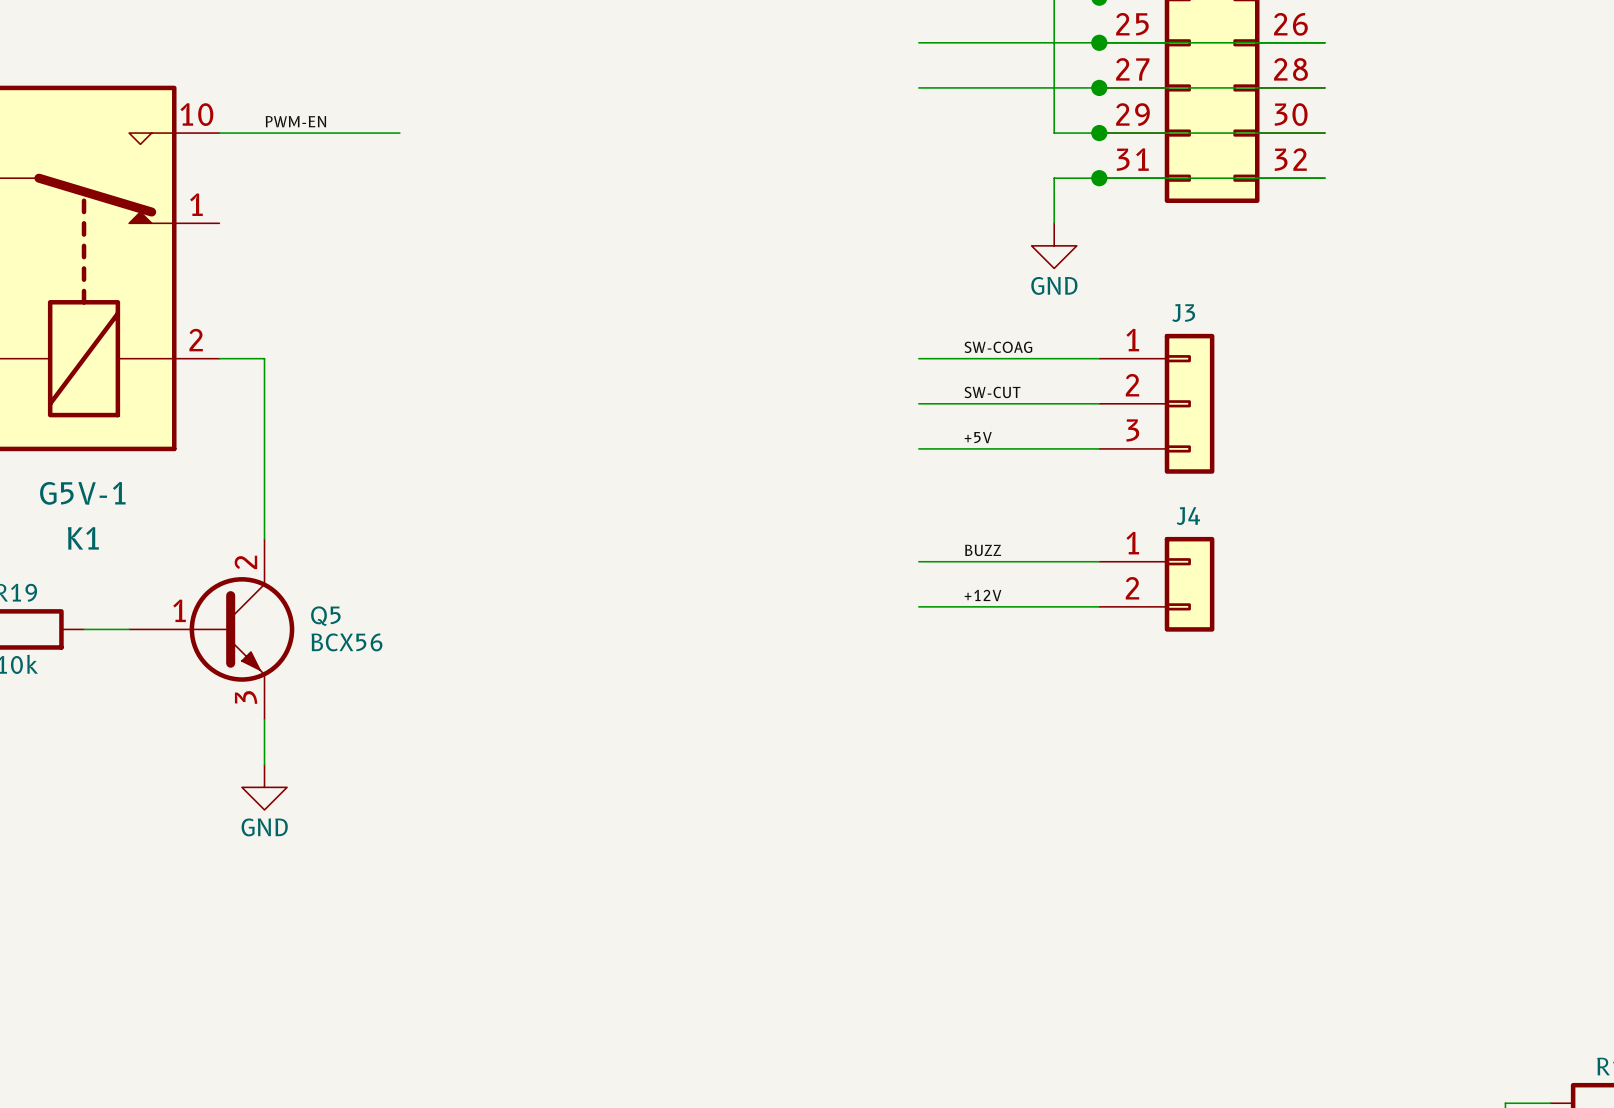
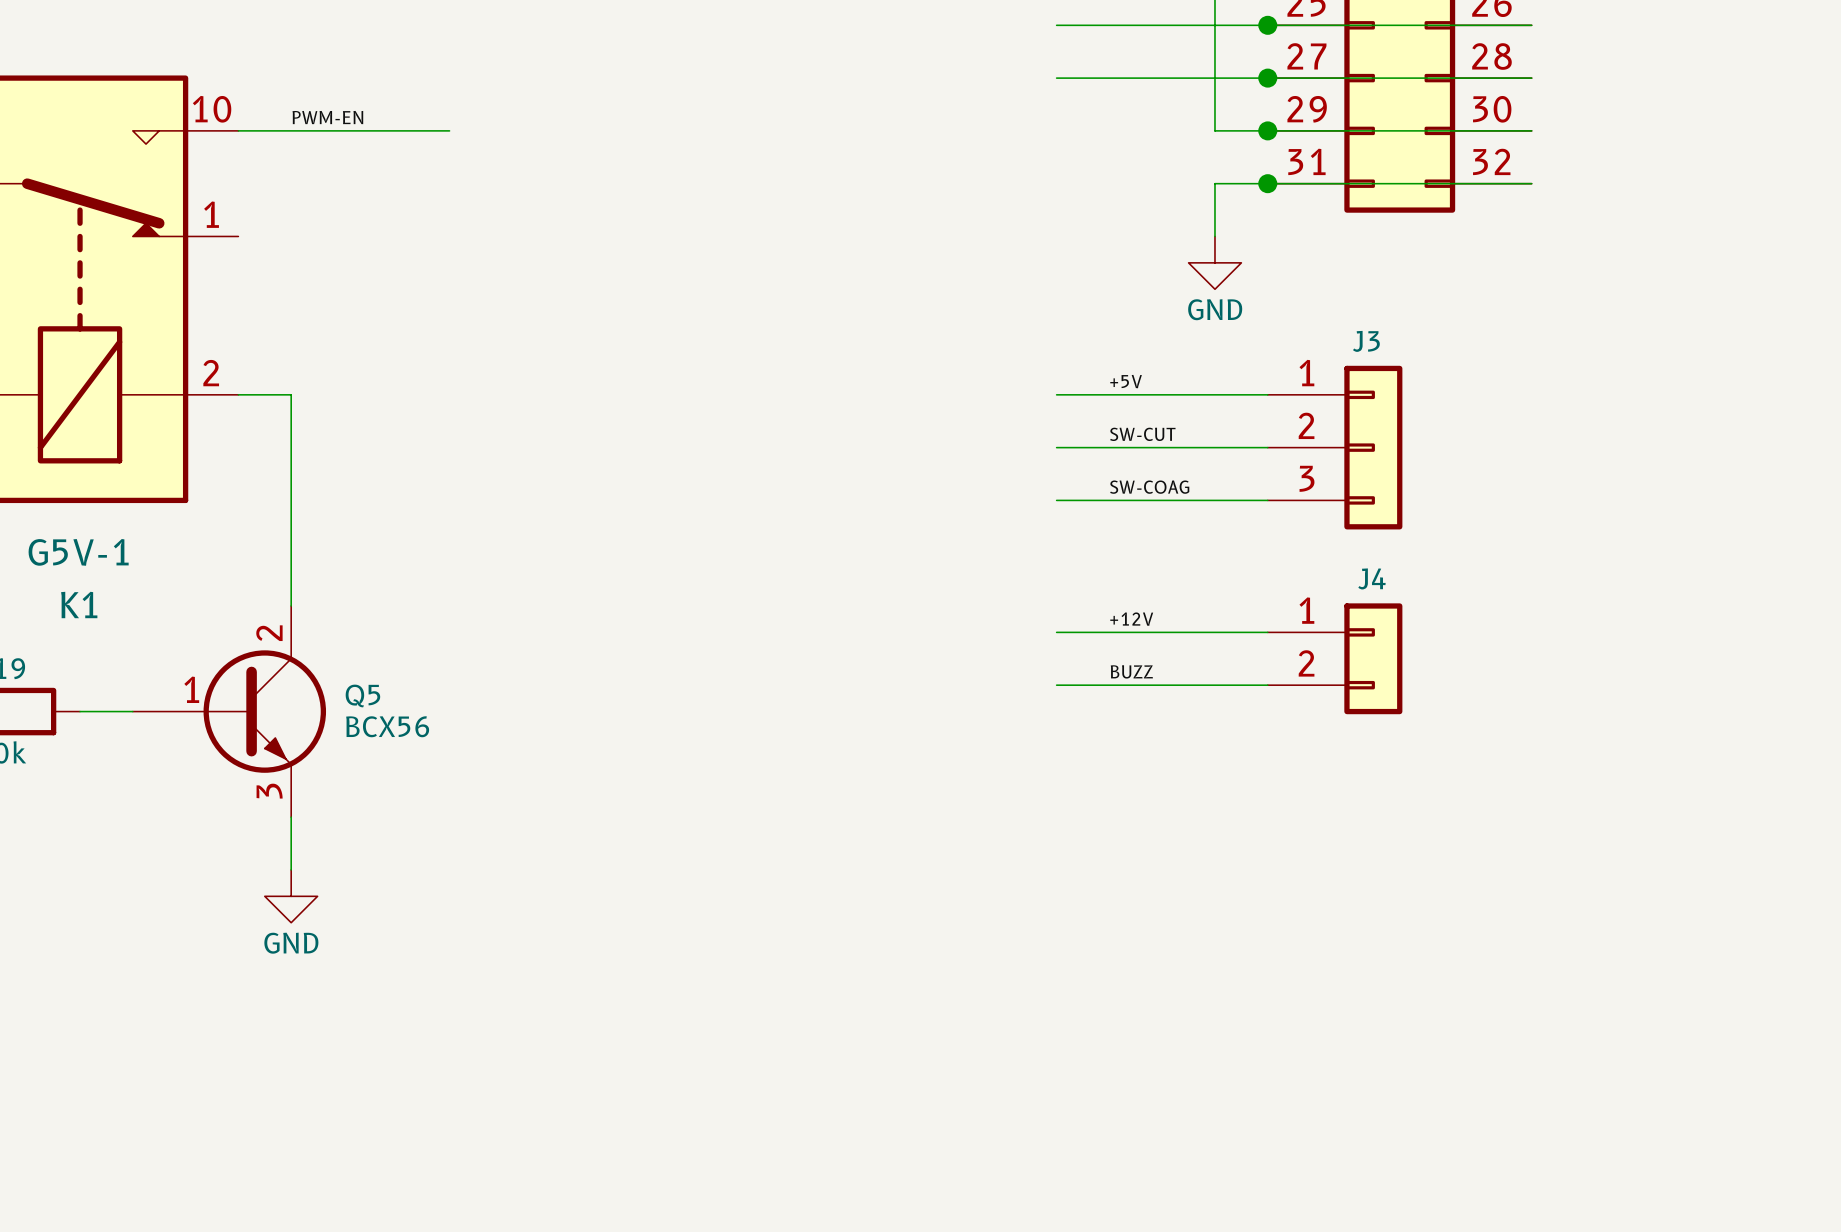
label: SW-COAG (998, 347) -> +5V (1126, 381)
label: +5V (978, 437) -> SW-COAG (1149, 487)
label: BUZZ (983, 550) -> +12V (1131, 619)
label: +12V (983, 595) -> BUZZ (1131, 671)

